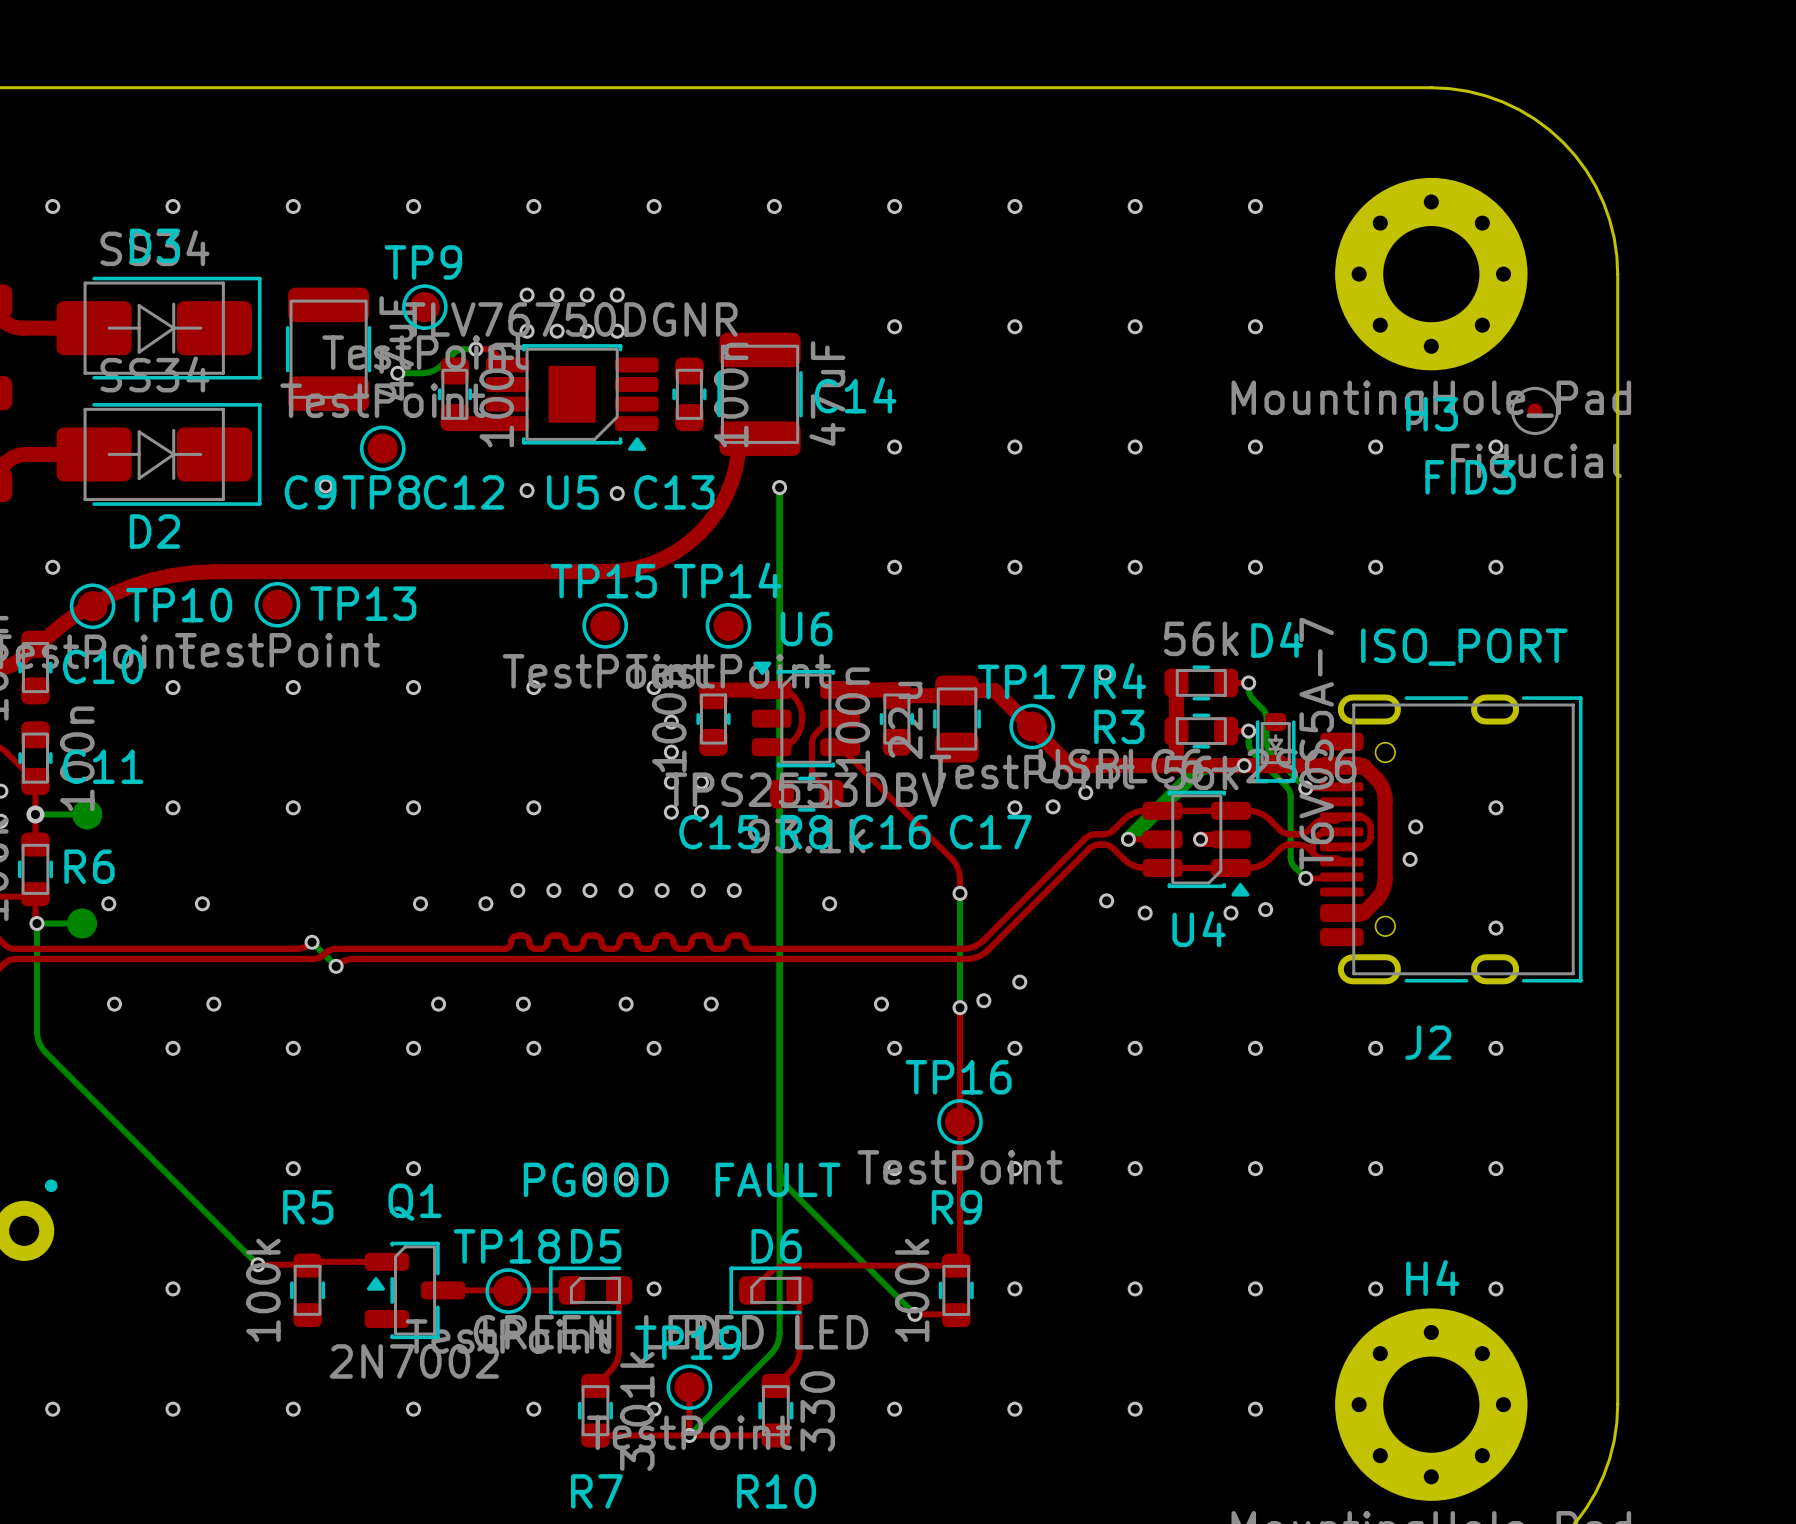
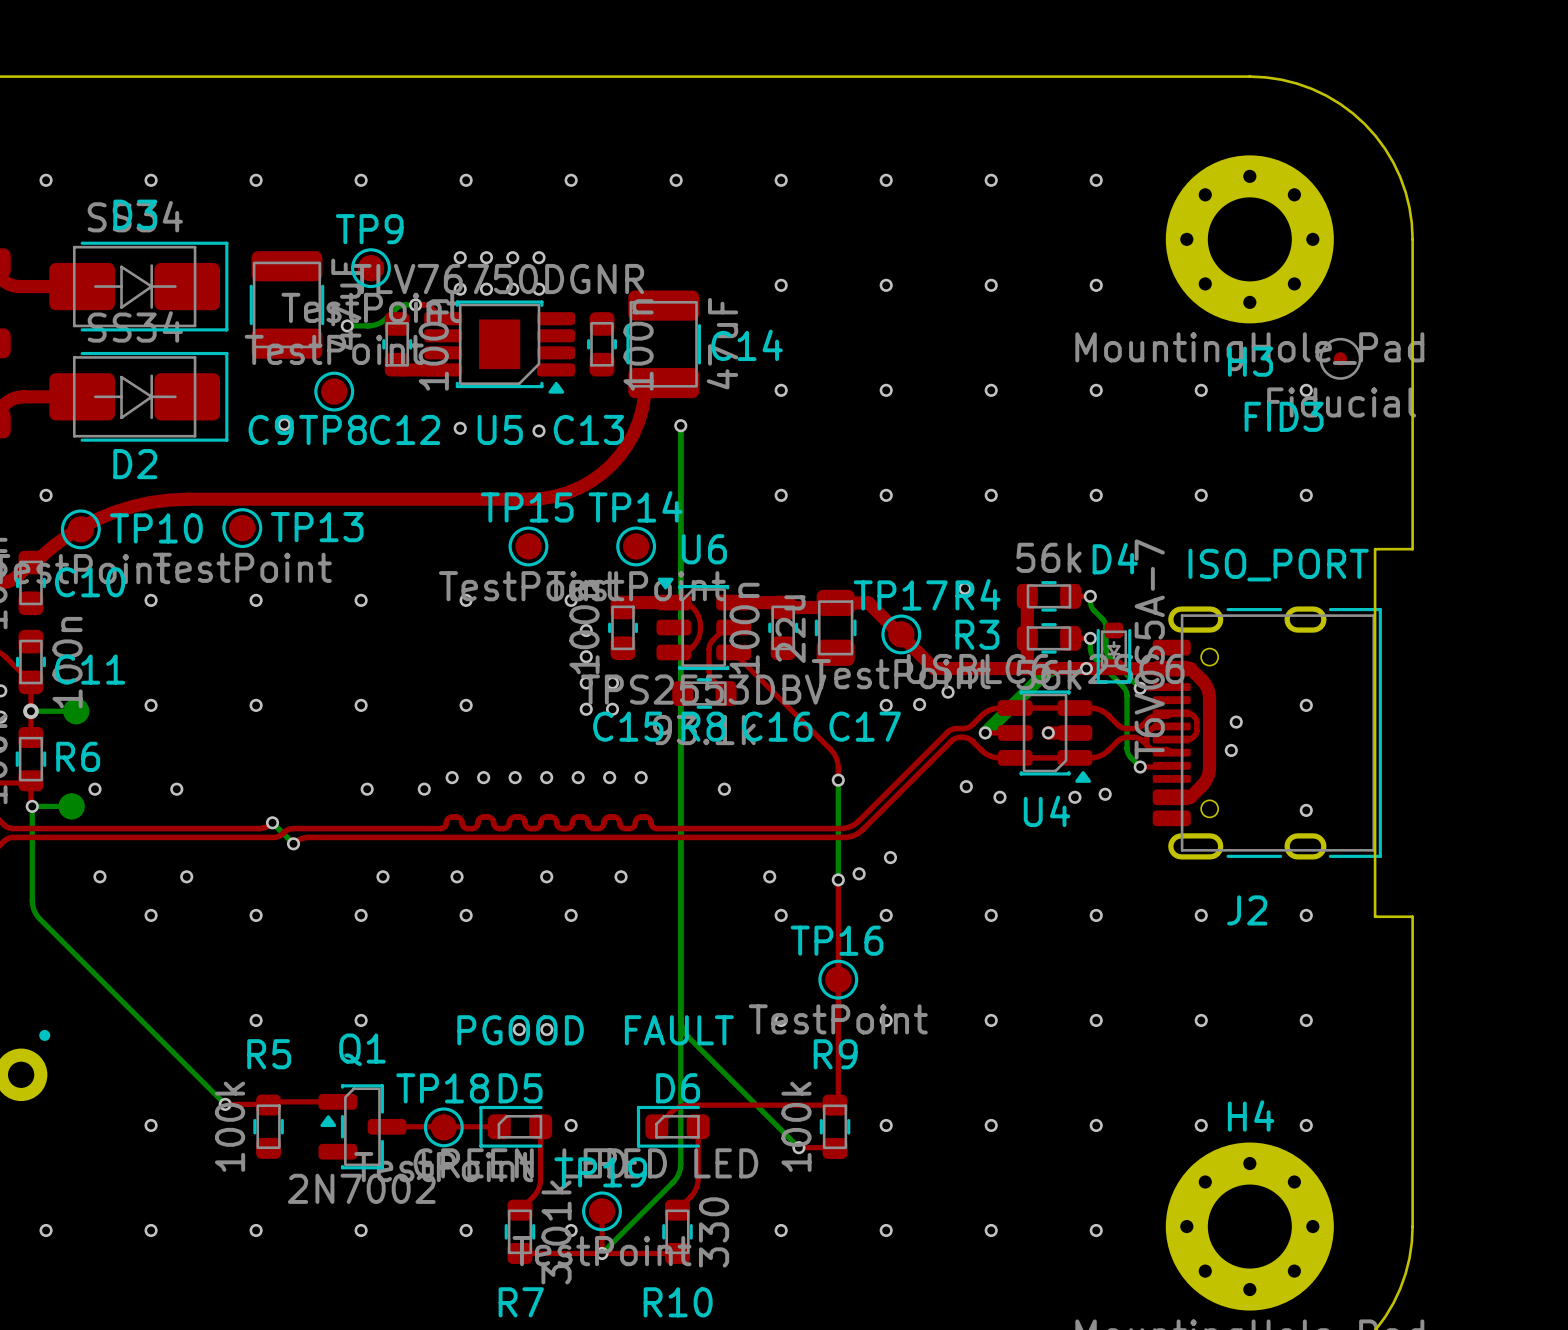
board edge: (1617, 628) (1617, 1049) -> (1412, 549) (1375, 549) (1375, 916) (1412, 916)

